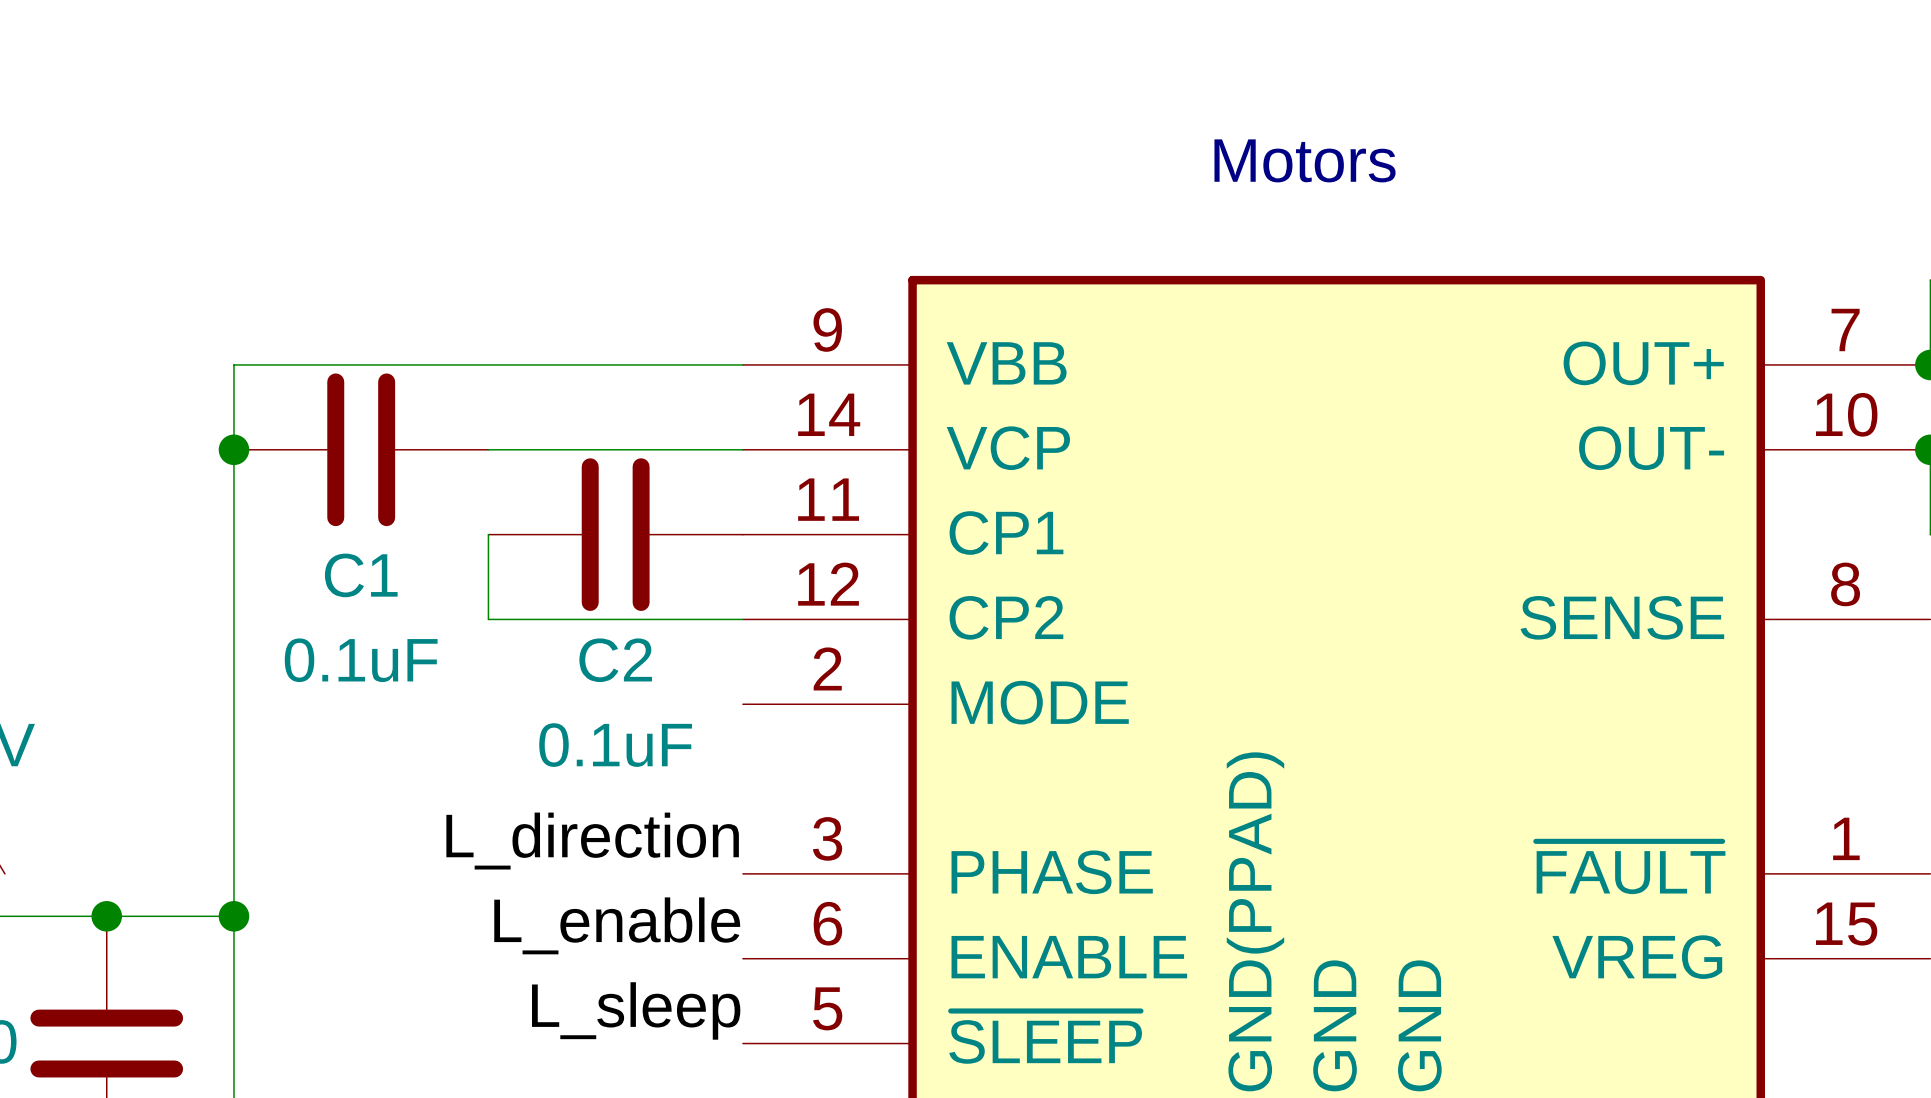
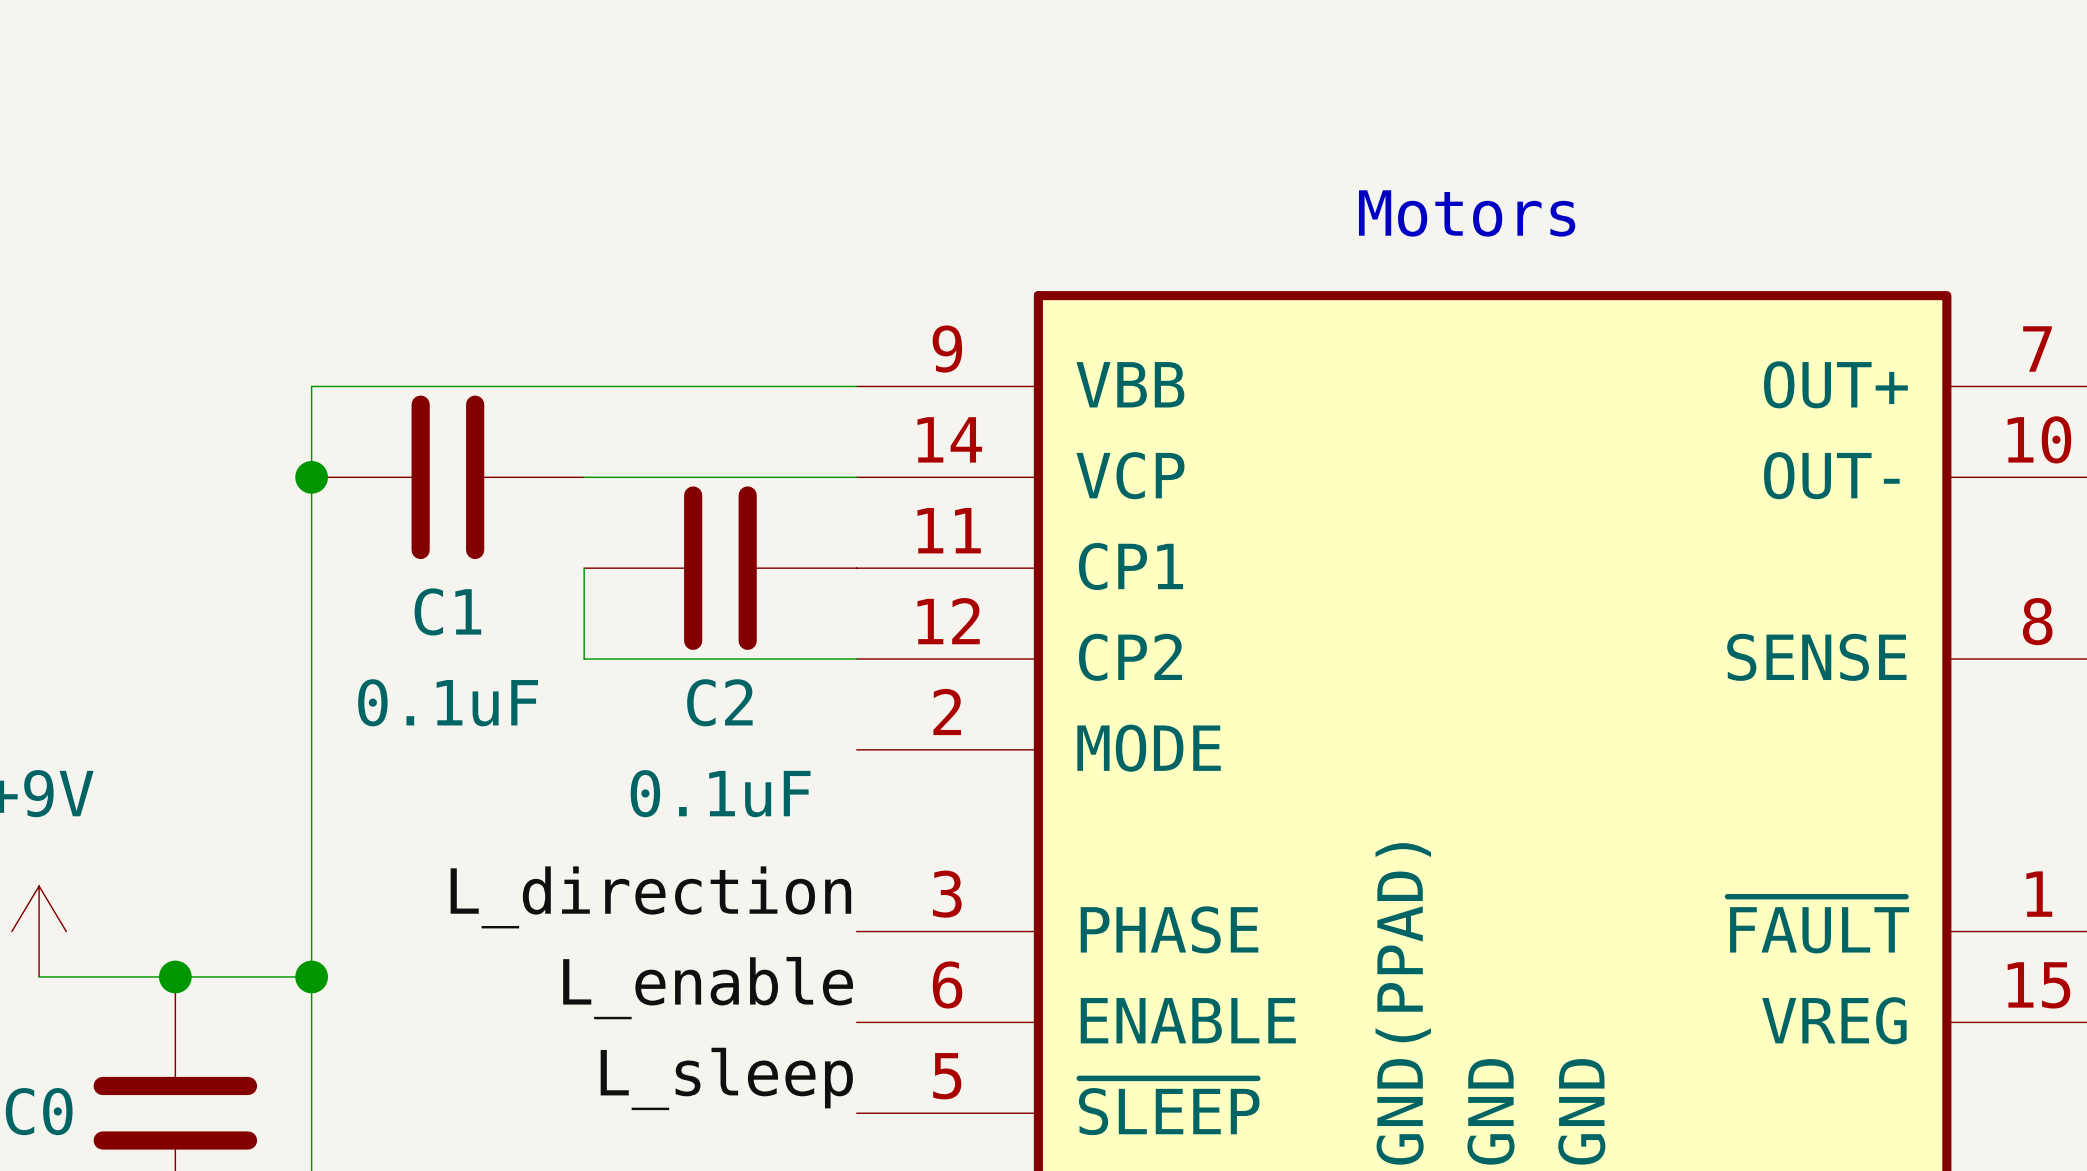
text position: Motors (1305, 160) -> Motors (1467, 213)

